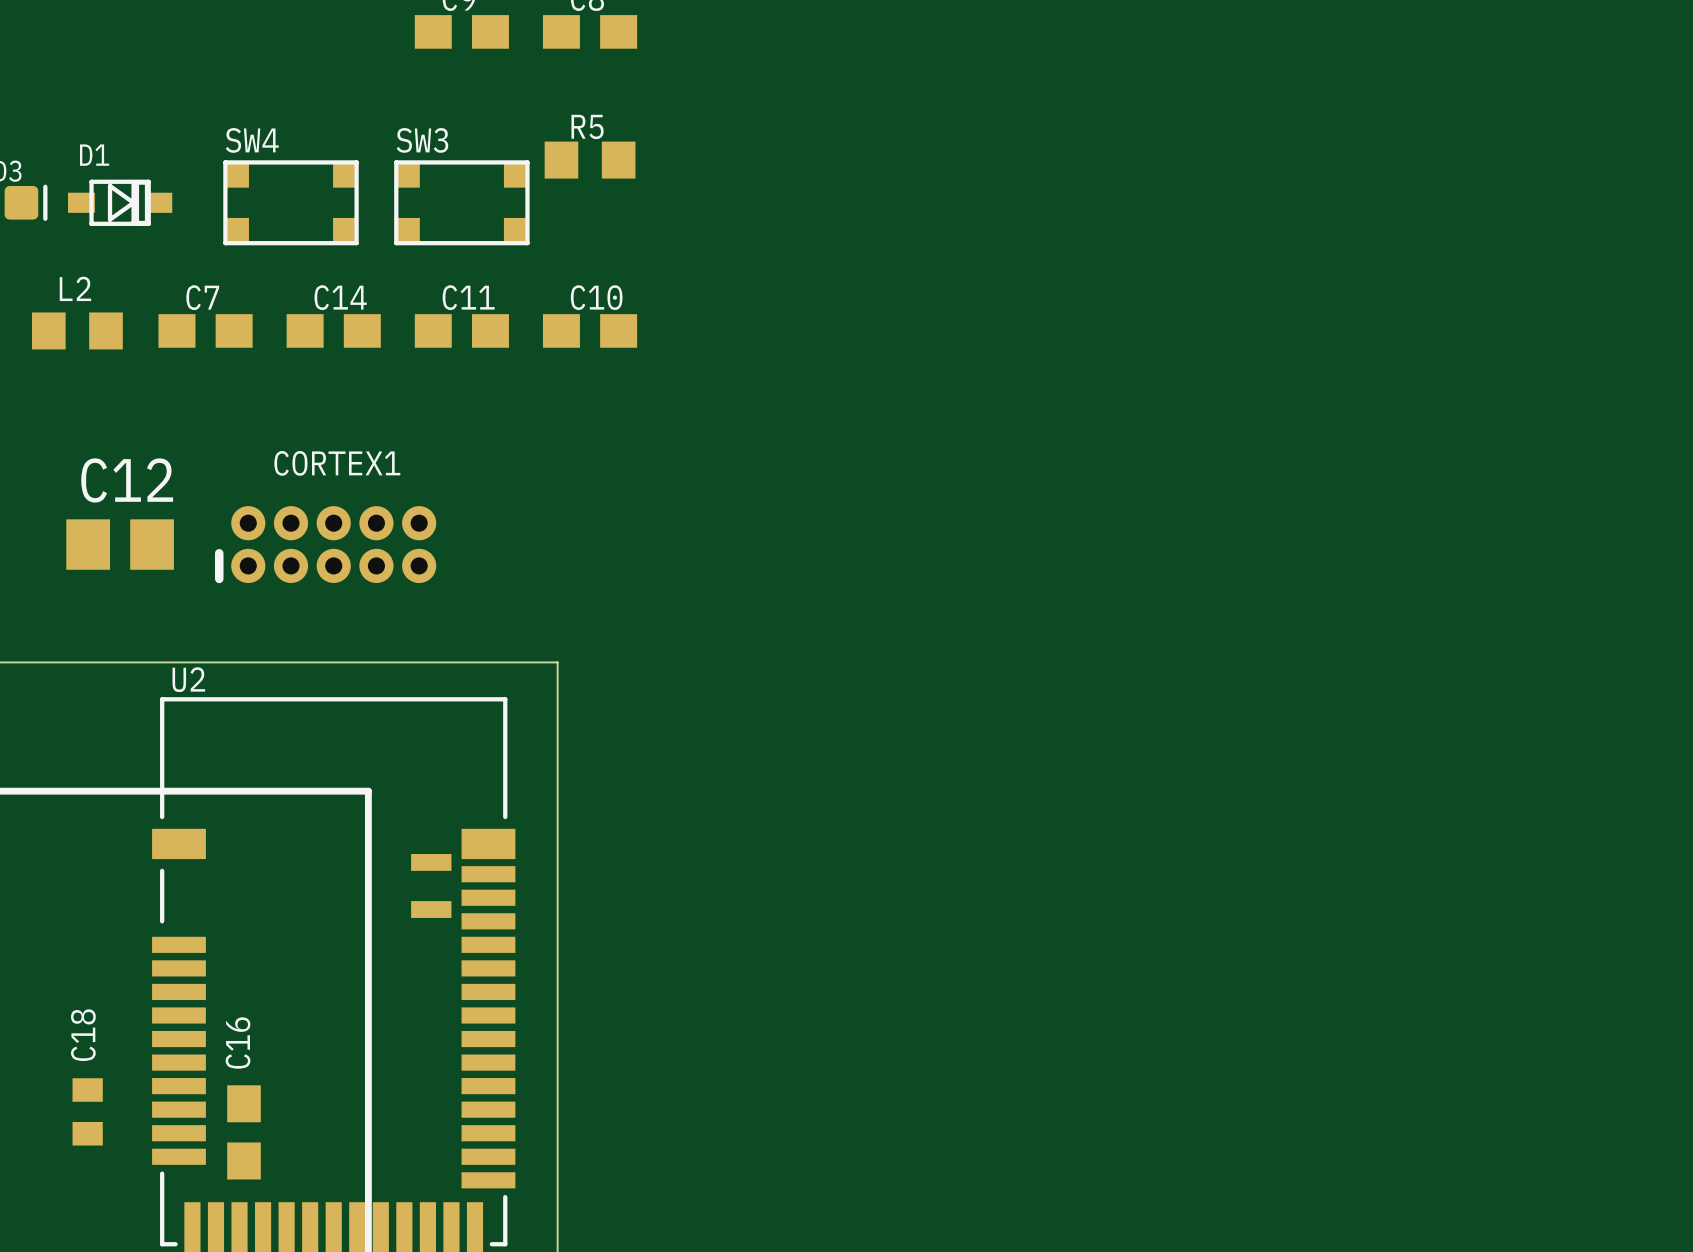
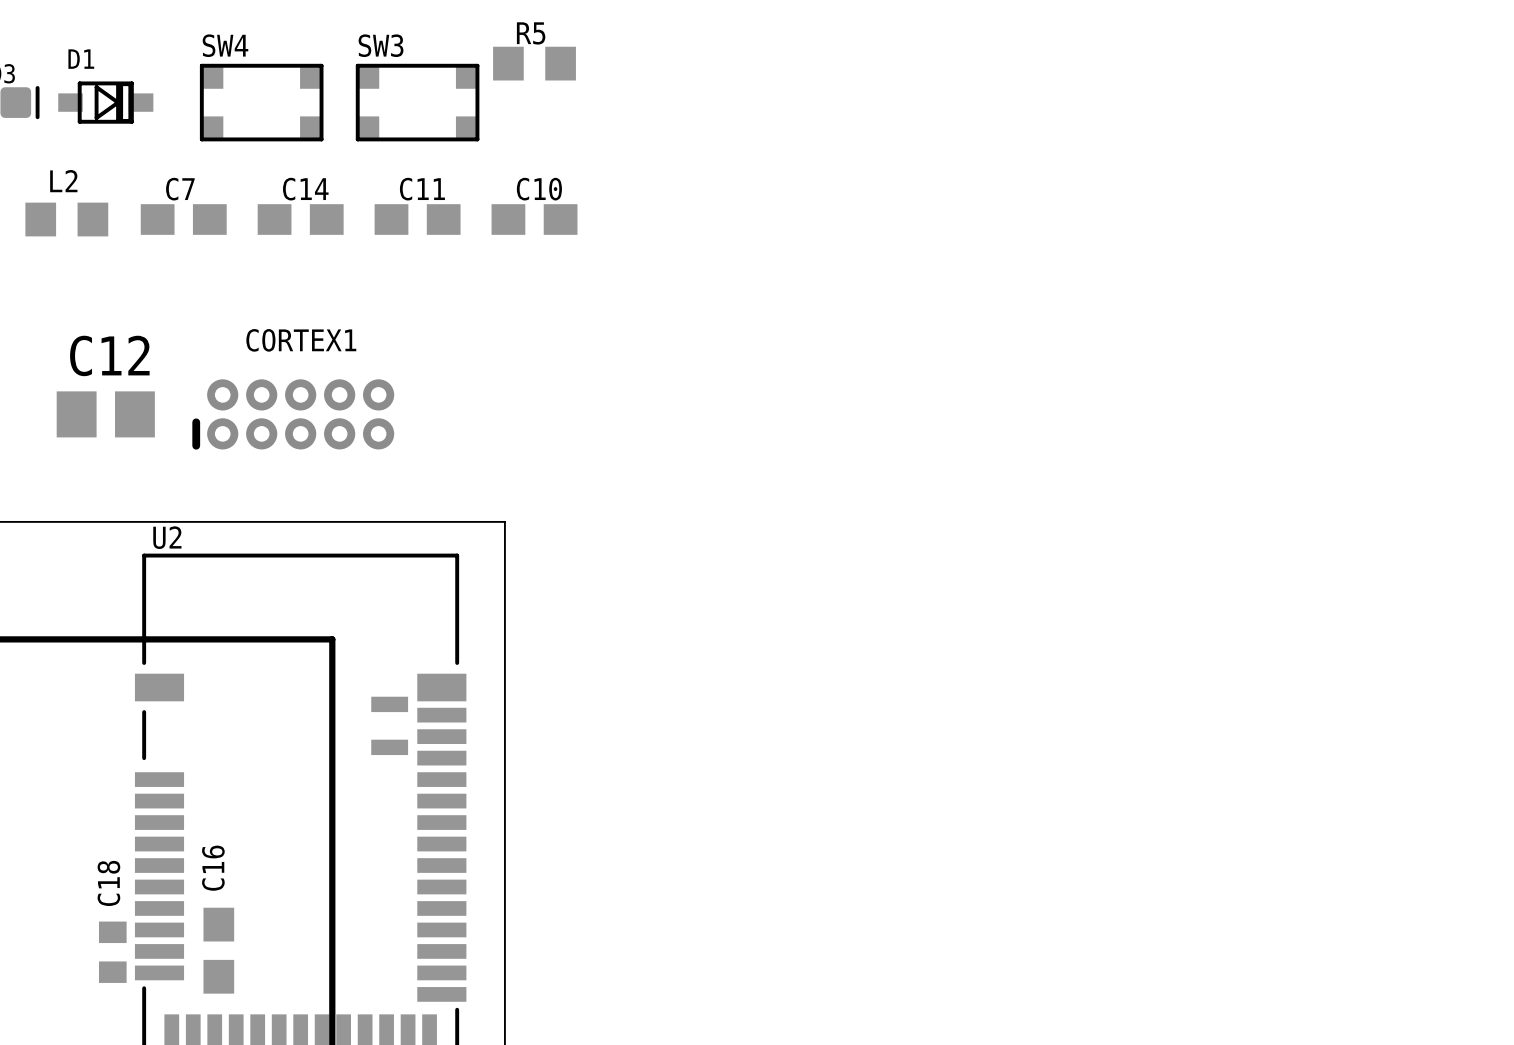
C18 position: (87, 1111) -> (112, 952)

